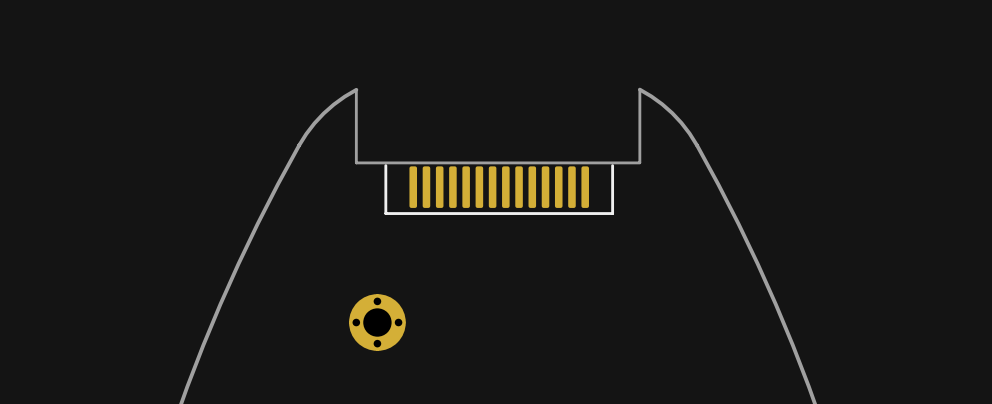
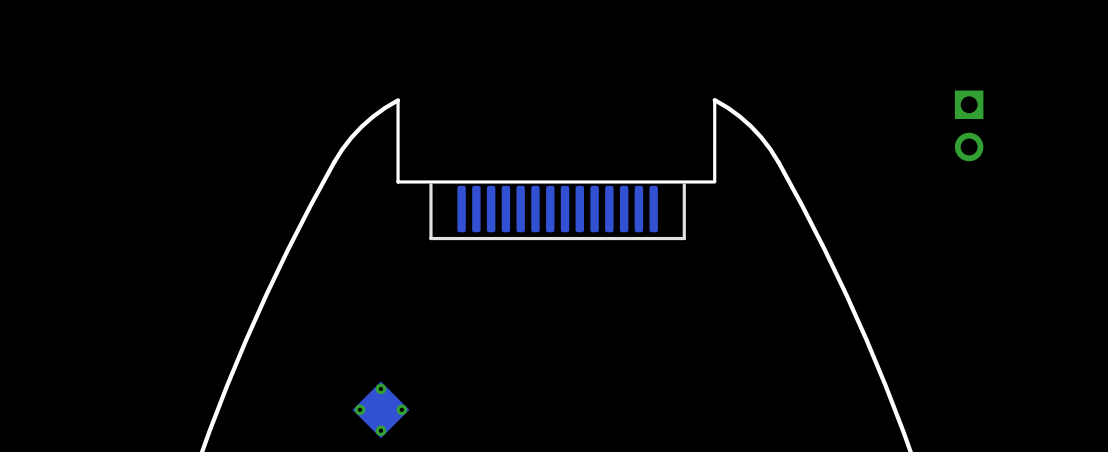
part: none -> (969, 125)
part: (377, 322) -> none
part: none -> (380, 409)

